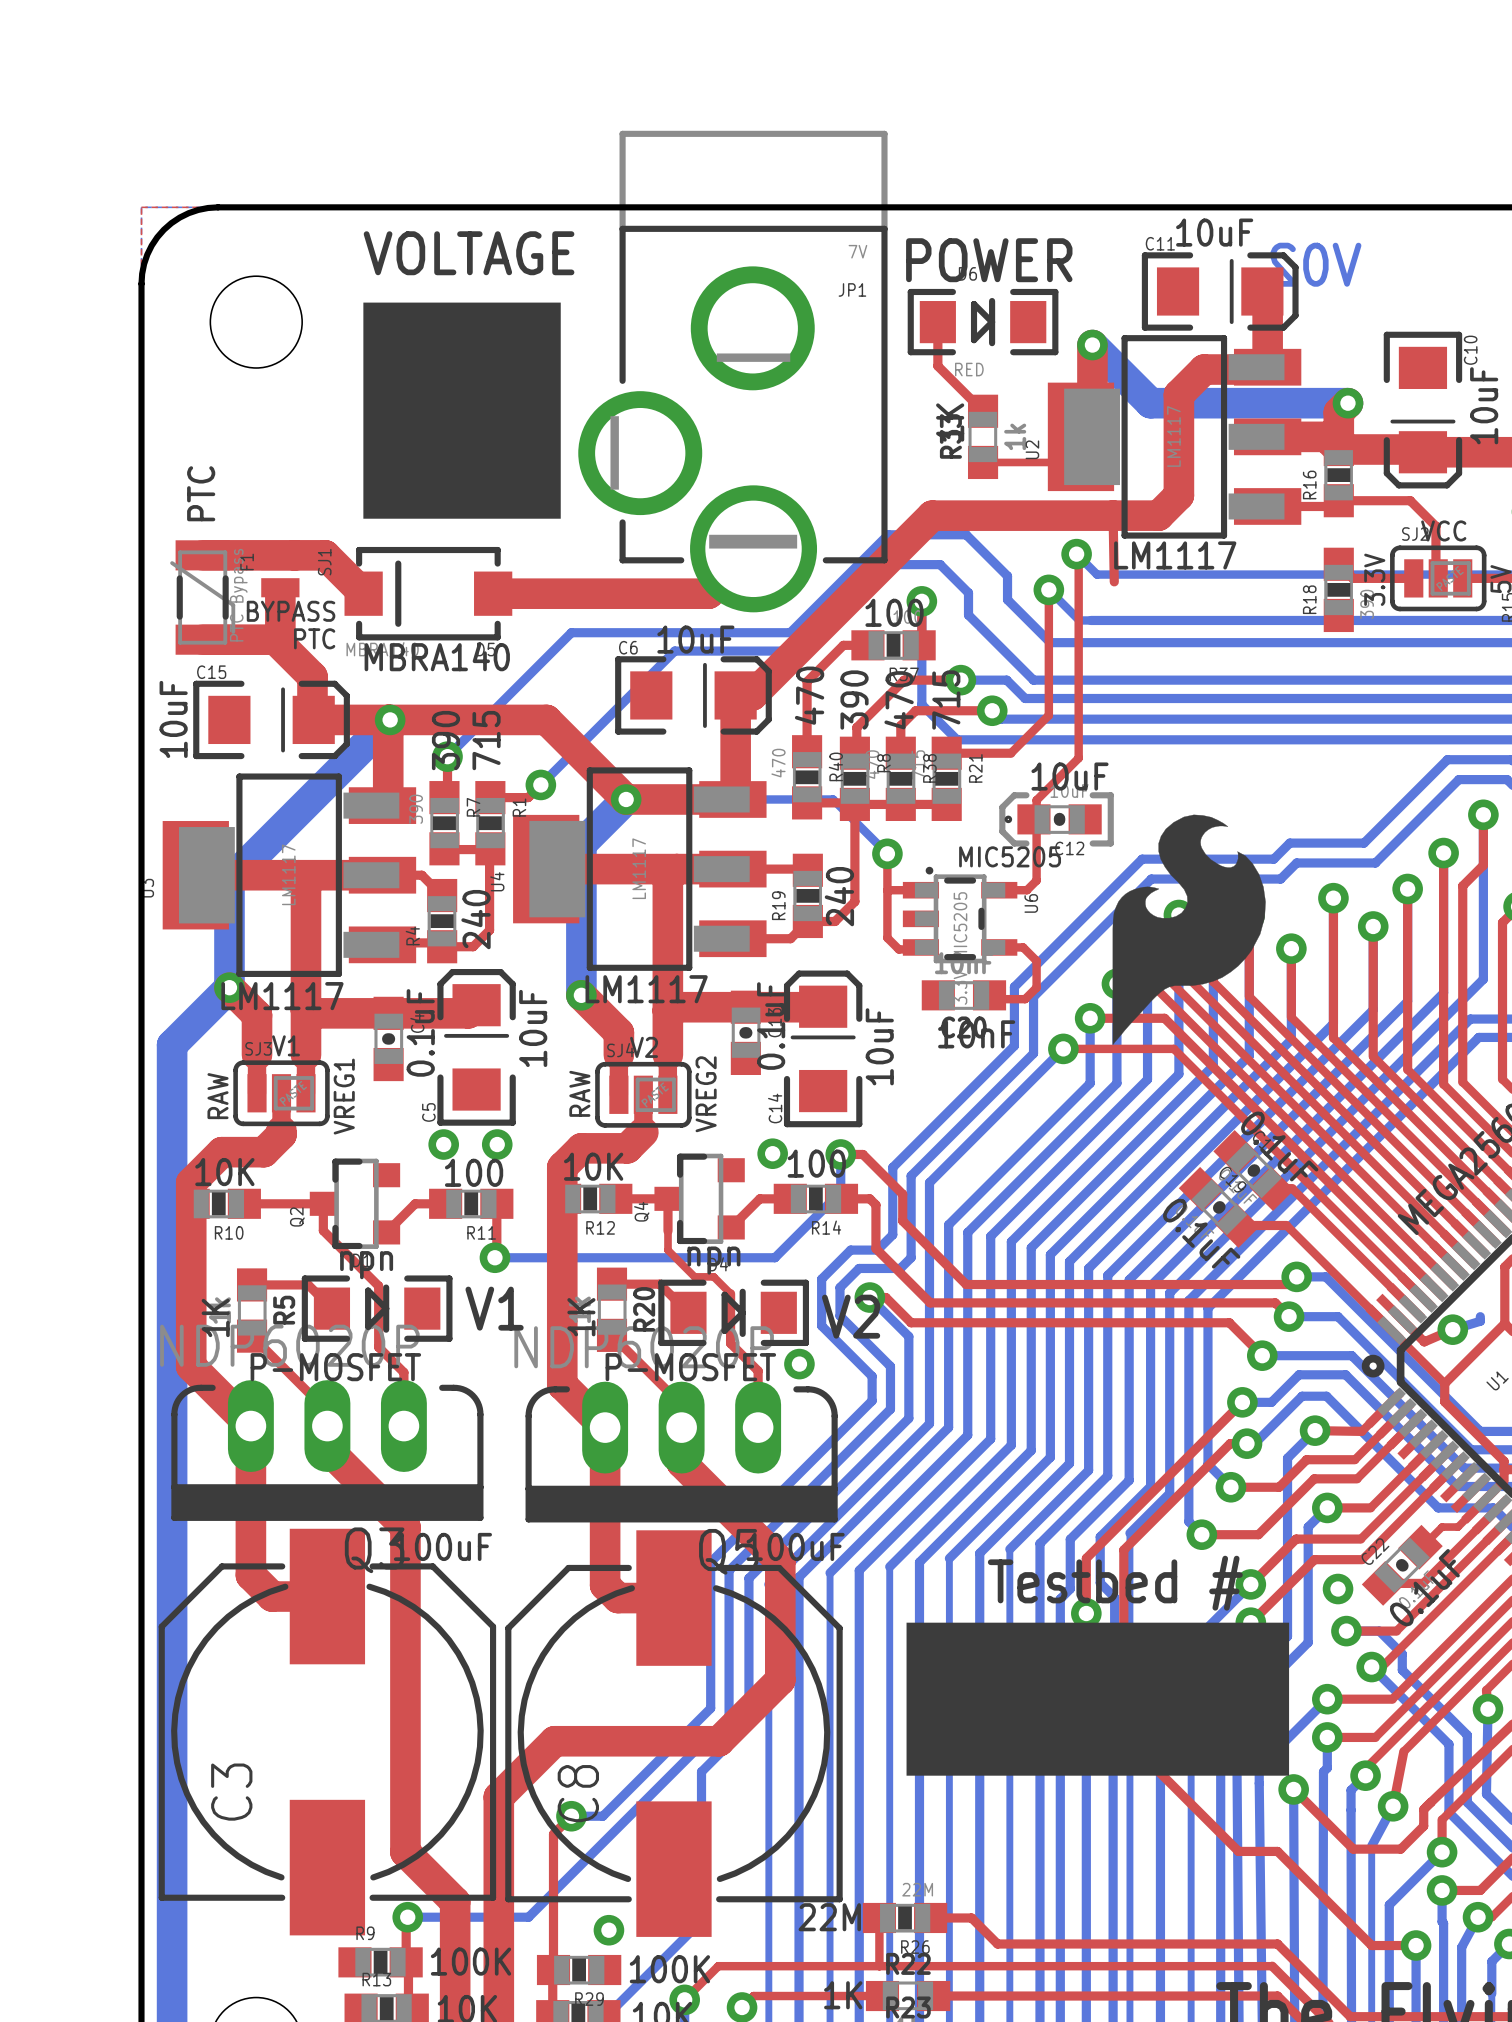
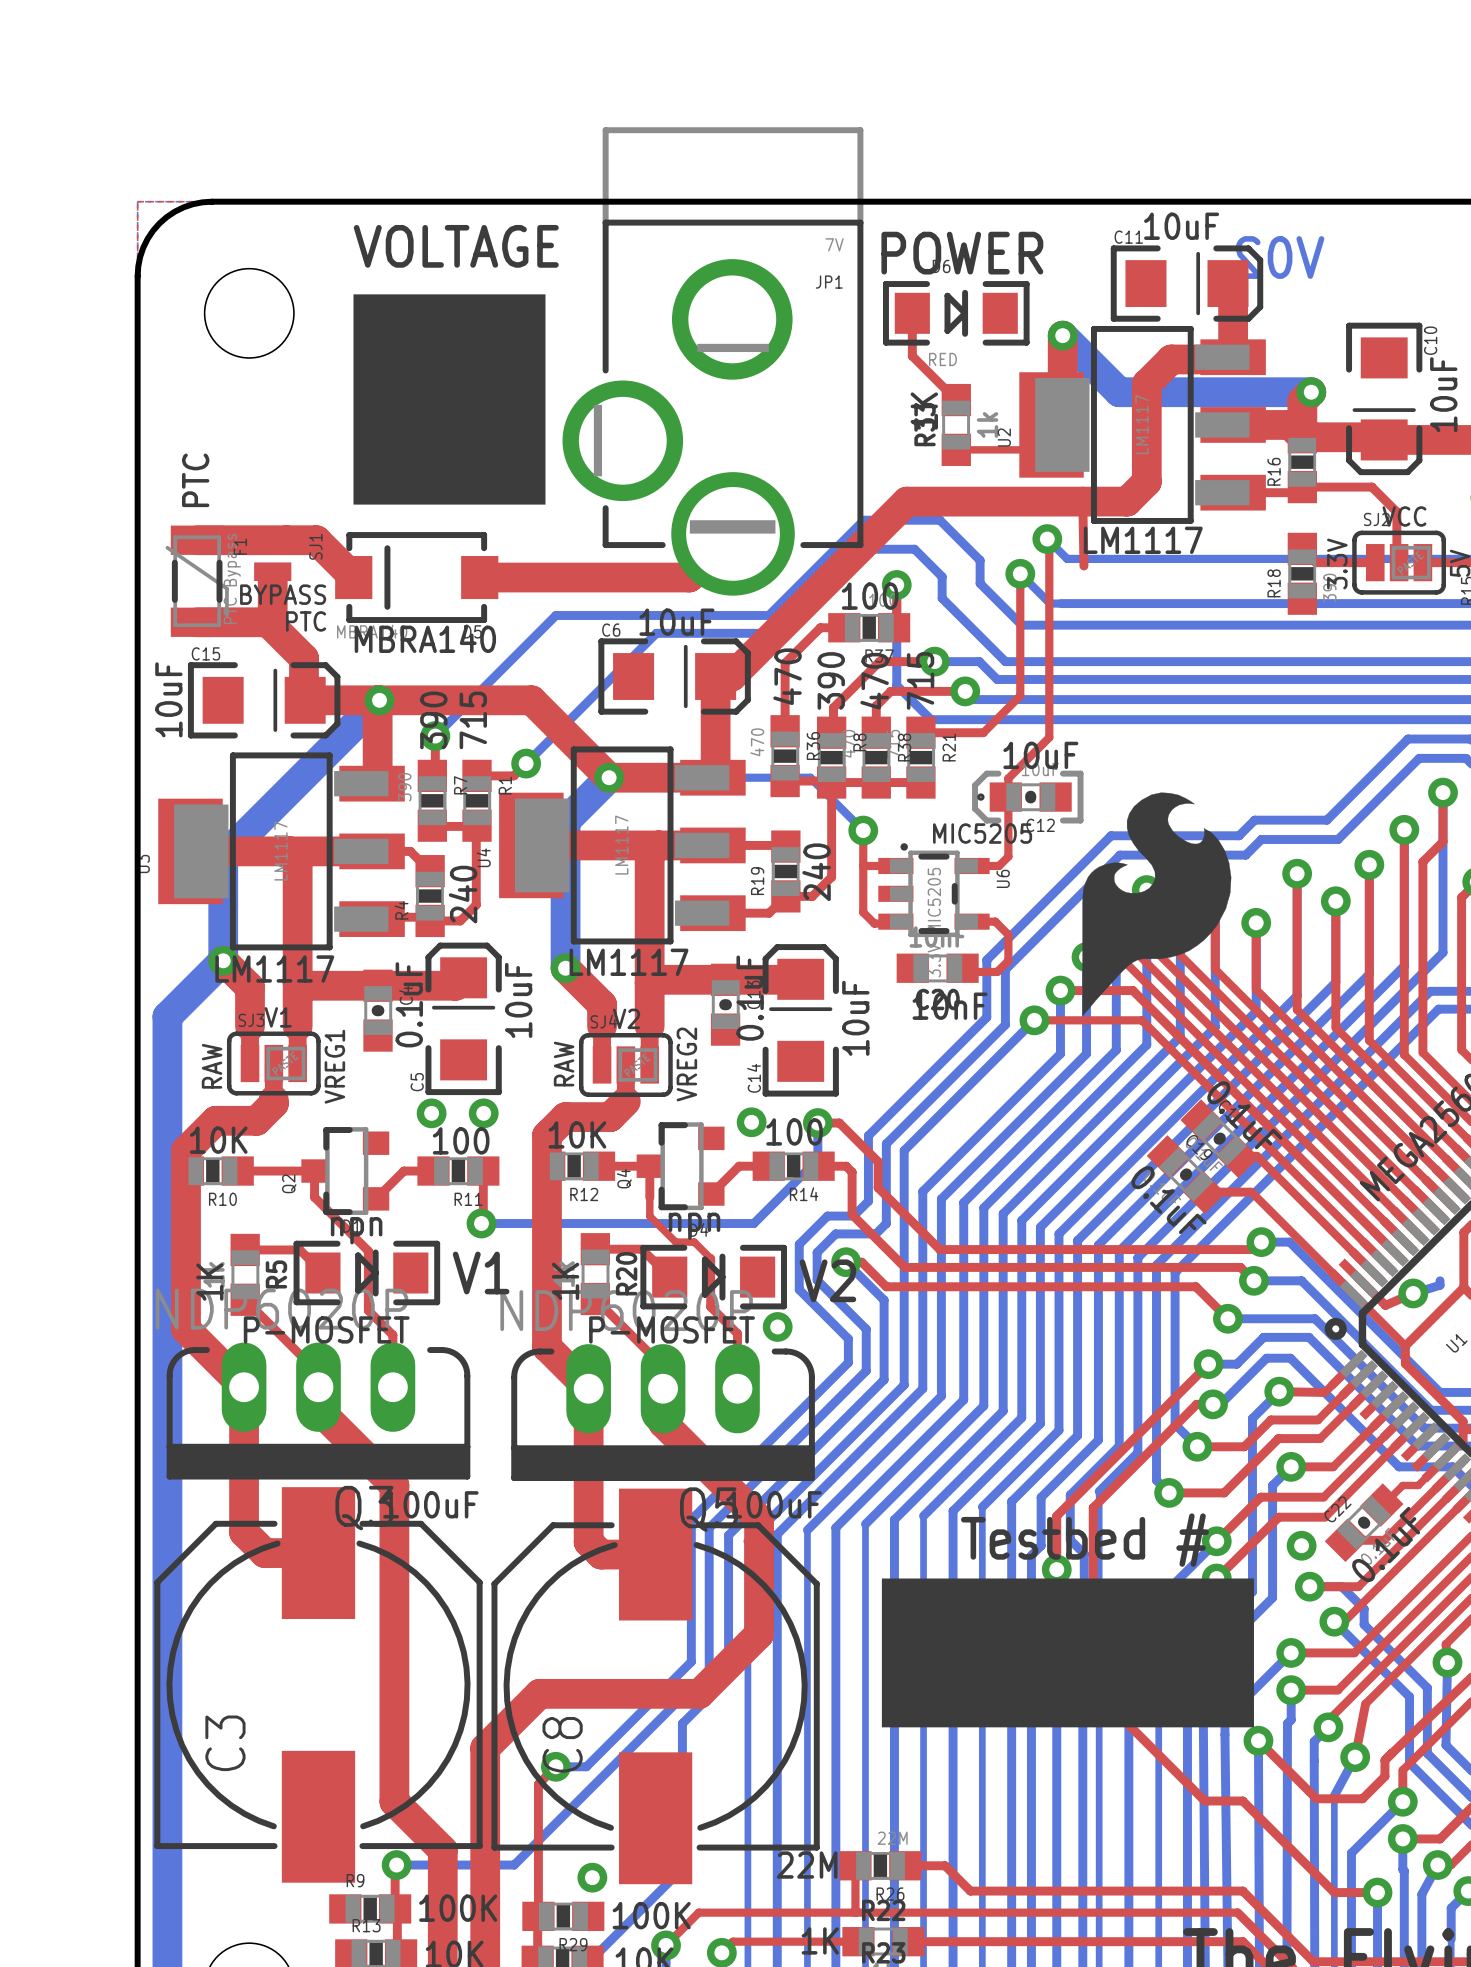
R40 name: R40 (835, 766) -> R36 (813, 746)

